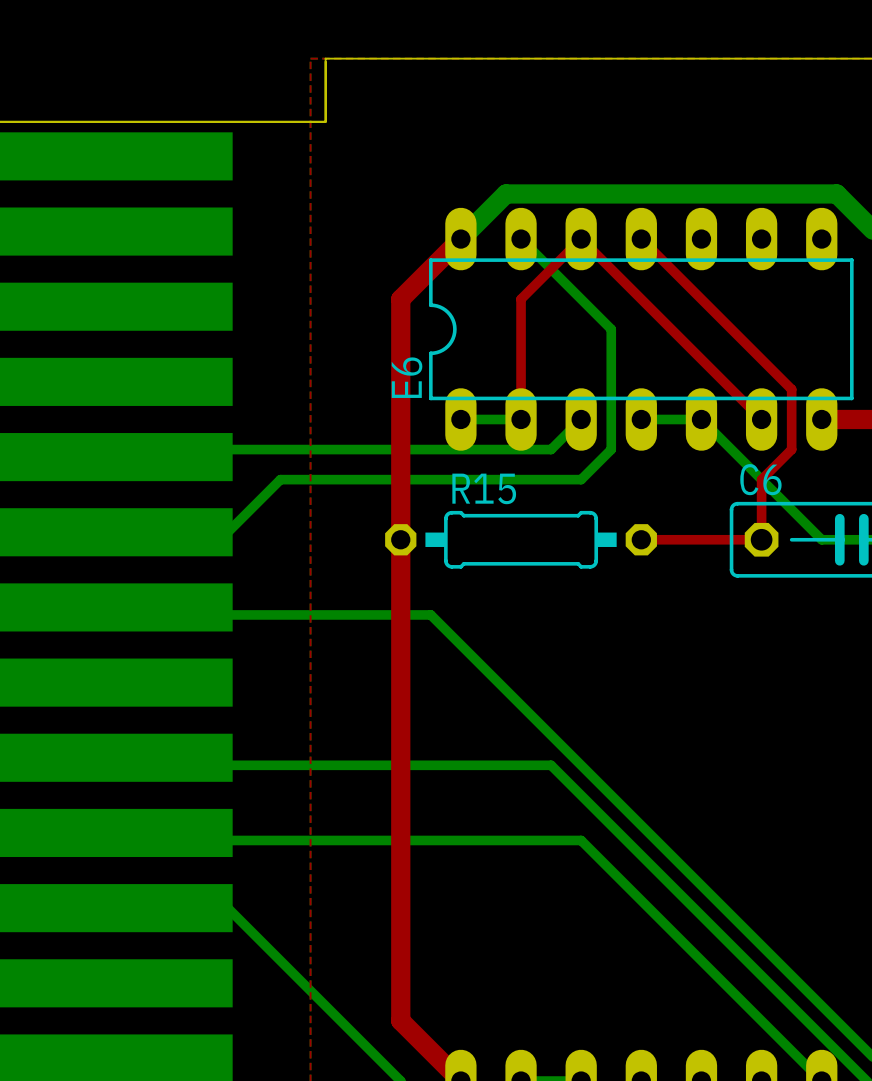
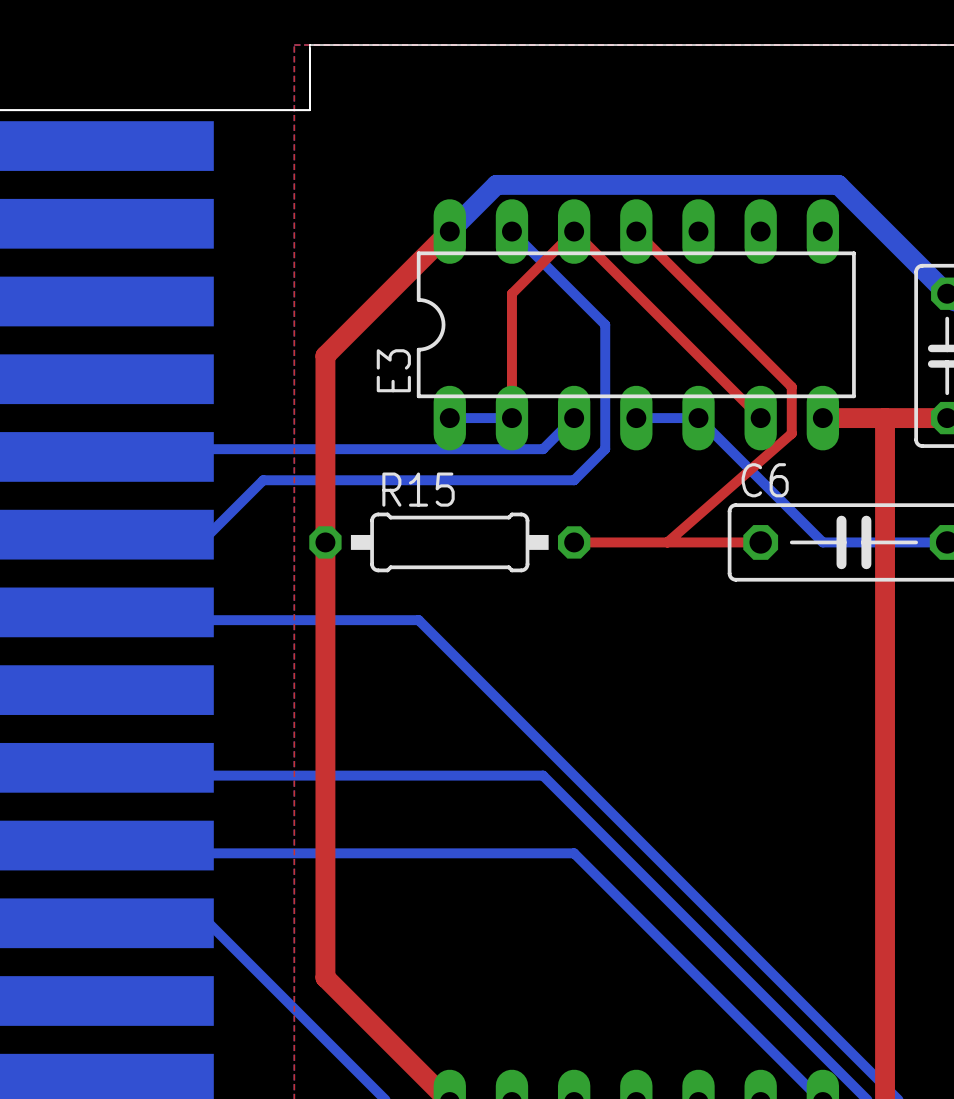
top track: (400, 299) (400, 1020) -> (387, 293) (325, 355) (325, 977) (387, 1039)
E6 name: E6 (407, 377) -> E3 (393, 370)
top track: (791, 434) (791, 449) (761, 479) (761, 539) -> (791, 433) (667, 542)
R15 position: (521, 539) -> (449, 542)
top track: none -> (574, 542) (636, 542)

